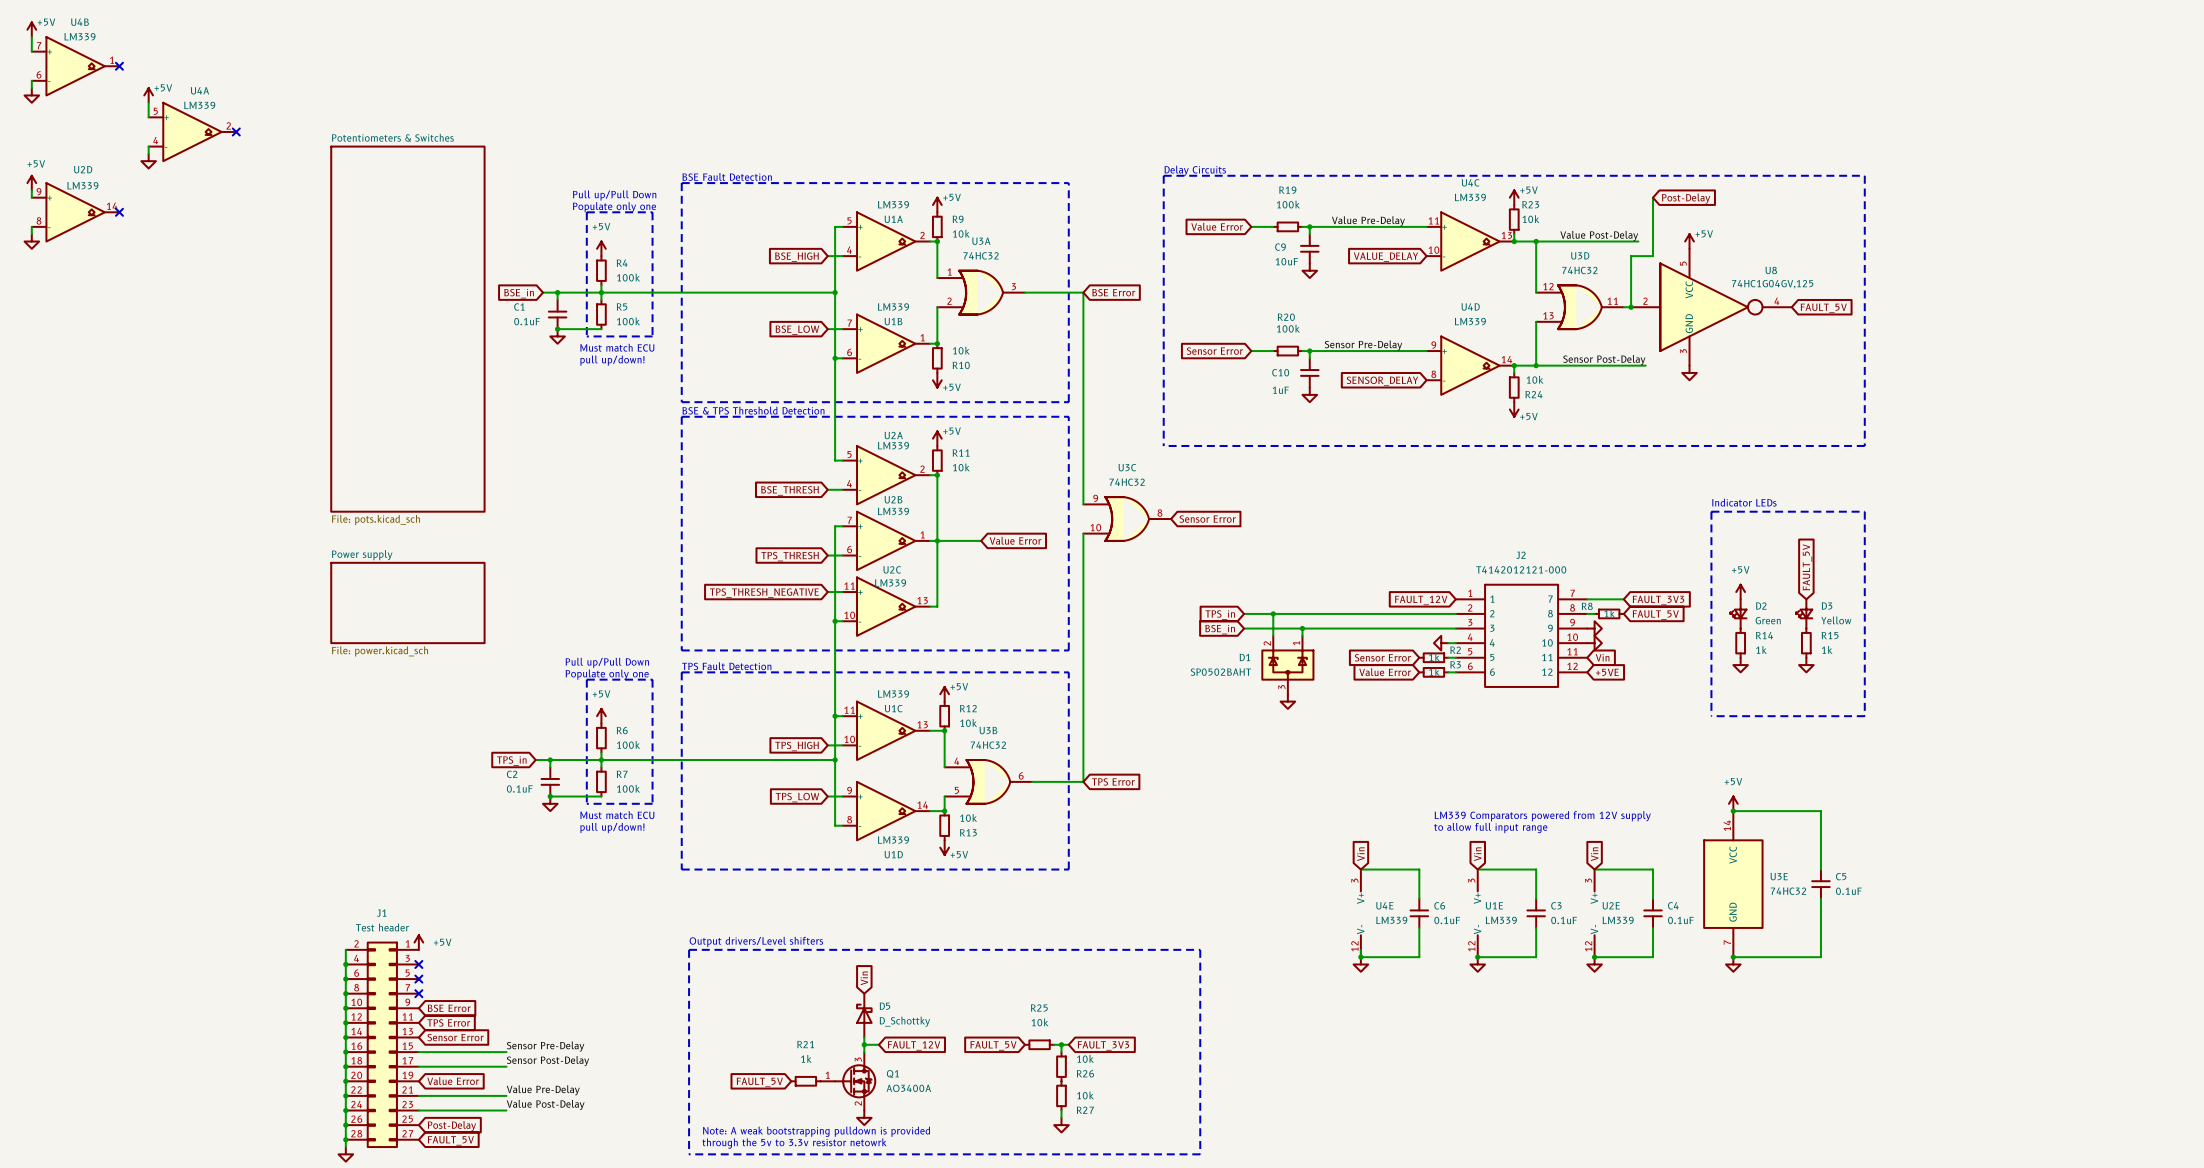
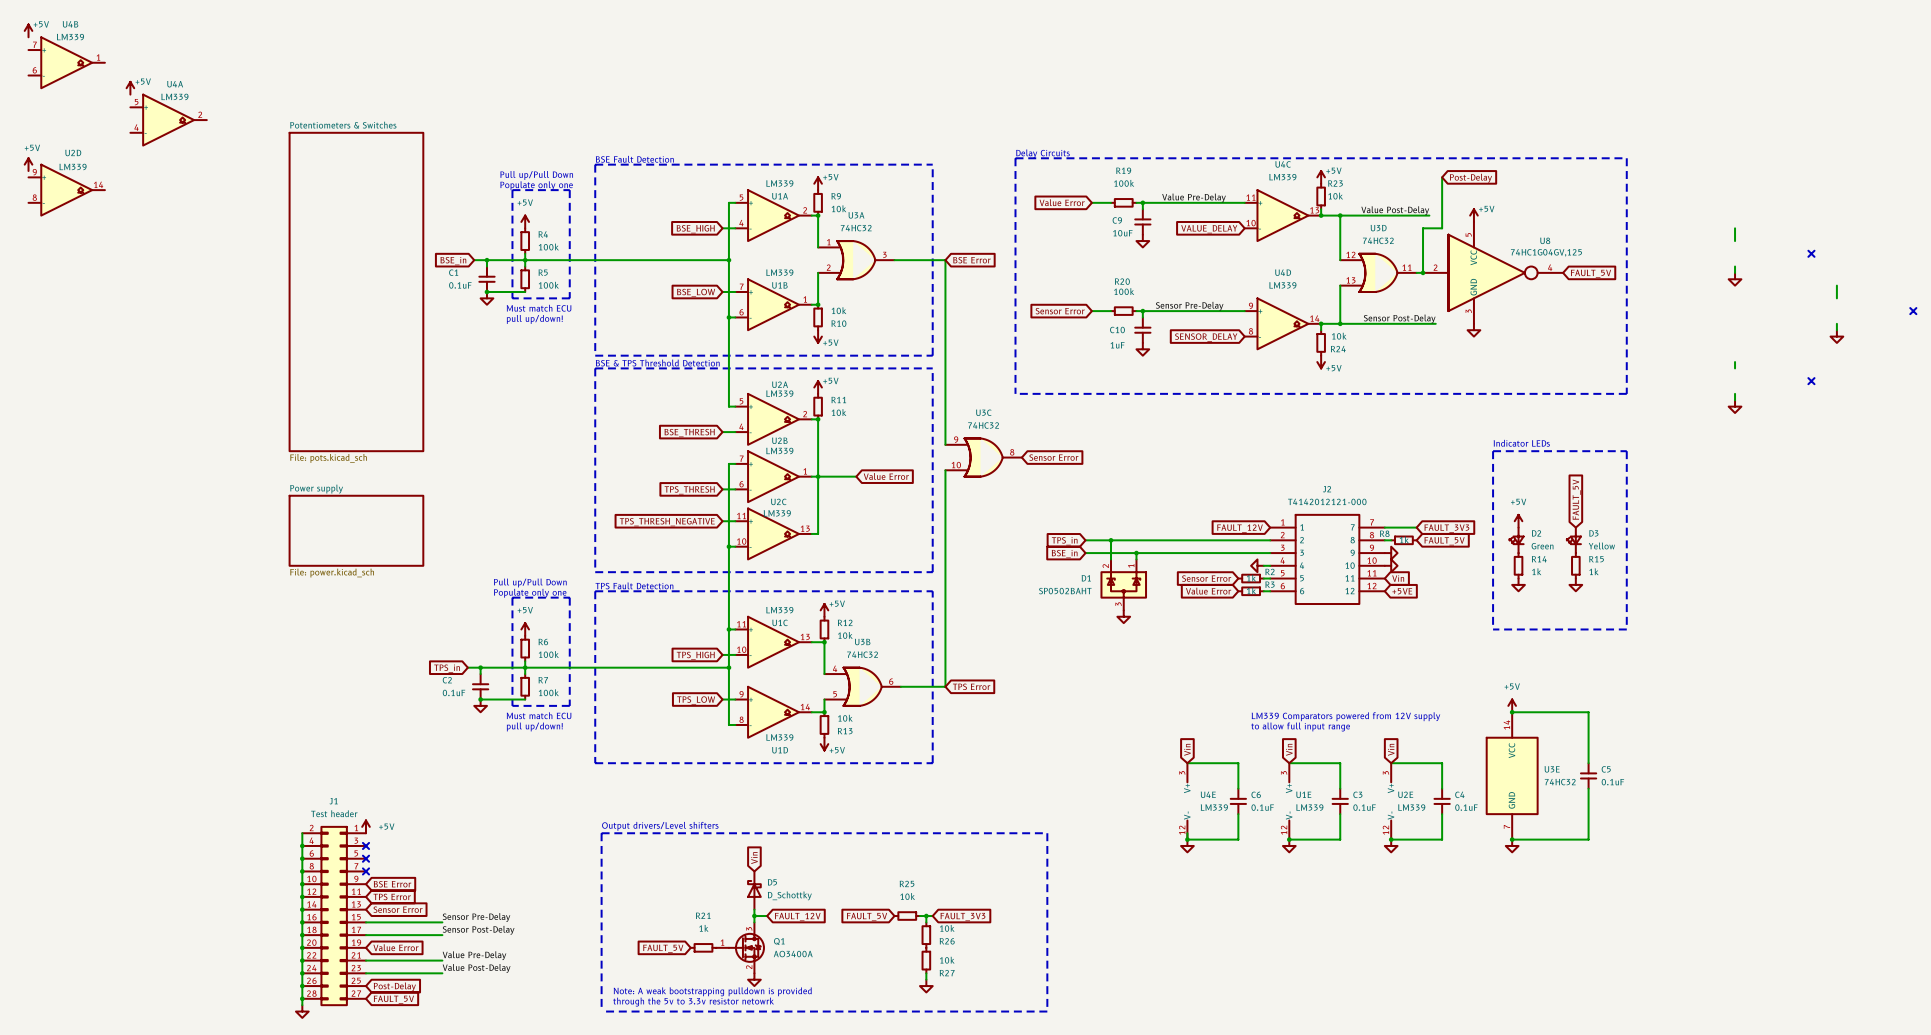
wire: (31, 37) (31, 51) -> none
no-connect mark: (119, 66) -> none
wire: (31, 80) (31, 88) -> none
power symbol: (31, 95) -> none
wire: (148, 102) (148, 117) -> none
no-connect mark: (236, 131) -> none
wire: (148, 146) (148, 153) -> none
power symbol: (148, 161) -> none
wire: (31, 190) (31, 197) -> none
no-connect mark: (119, 212) -> none
wire: (31, 226) (31, 234) -> none
power symbol: (31, 241) -> none
wire: none -> (1735, 228) (1735, 241)
no-connect mark: none -> (1811, 253)
wire: none -> (1735, 266) (1735, 272)
power symbol: none -> (1735, 279)
wire: none -> (1836, 285) (1836, 298)
no-connect mark: none -> (1913, 311)
wire: none -> (1836, 323) (1836, 330)
power symbol: none -> (1836, 336)
wire: none -> (1735, 362) (1735, 368)
no-connect mark: none -> (1811, 381)
wire: none -> (1735, 393) (1735, 400)
power symbol: none -> (1735, 406)

